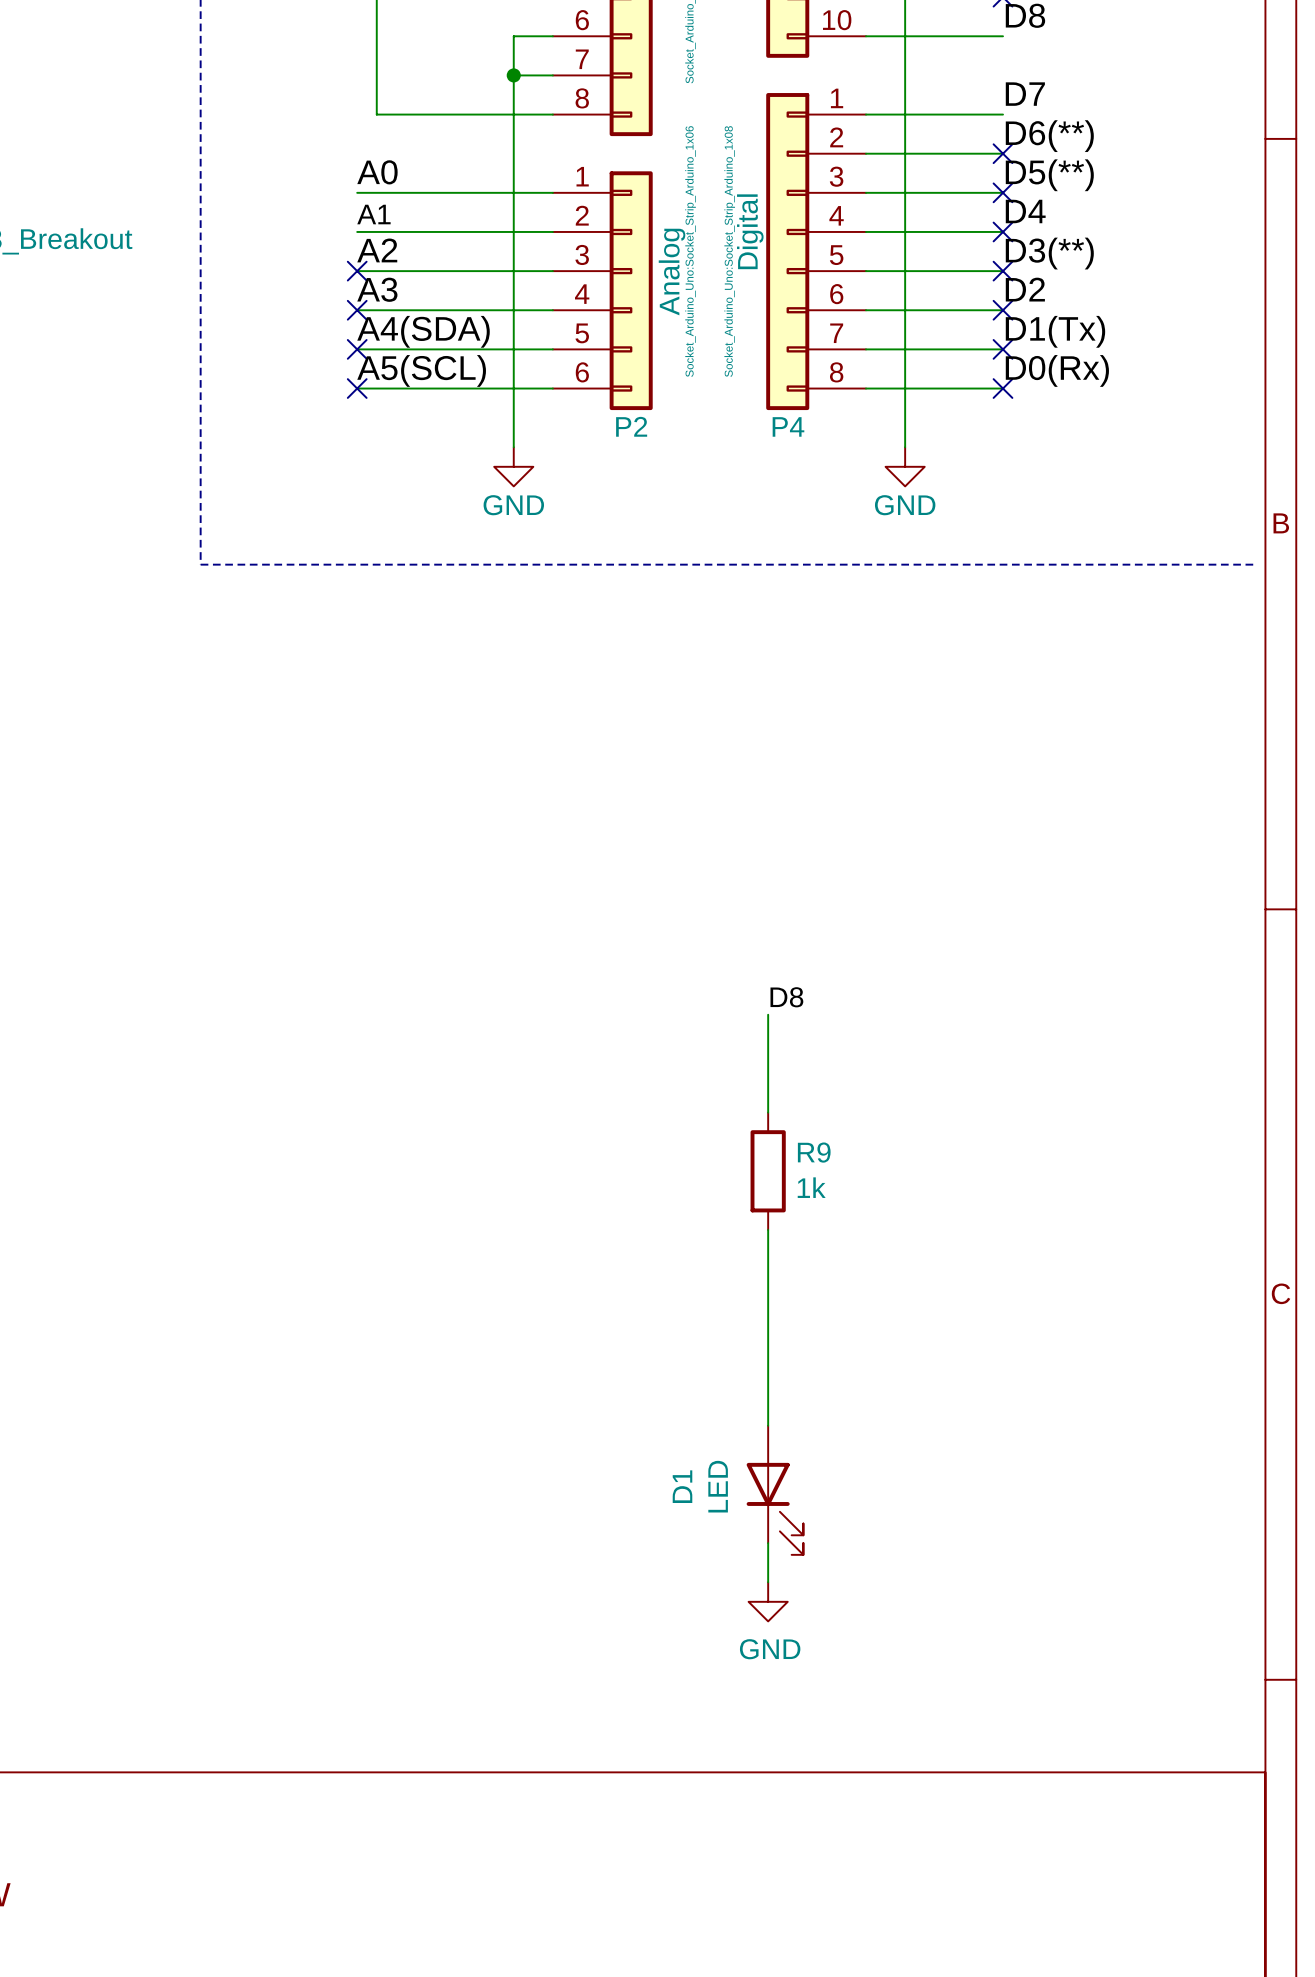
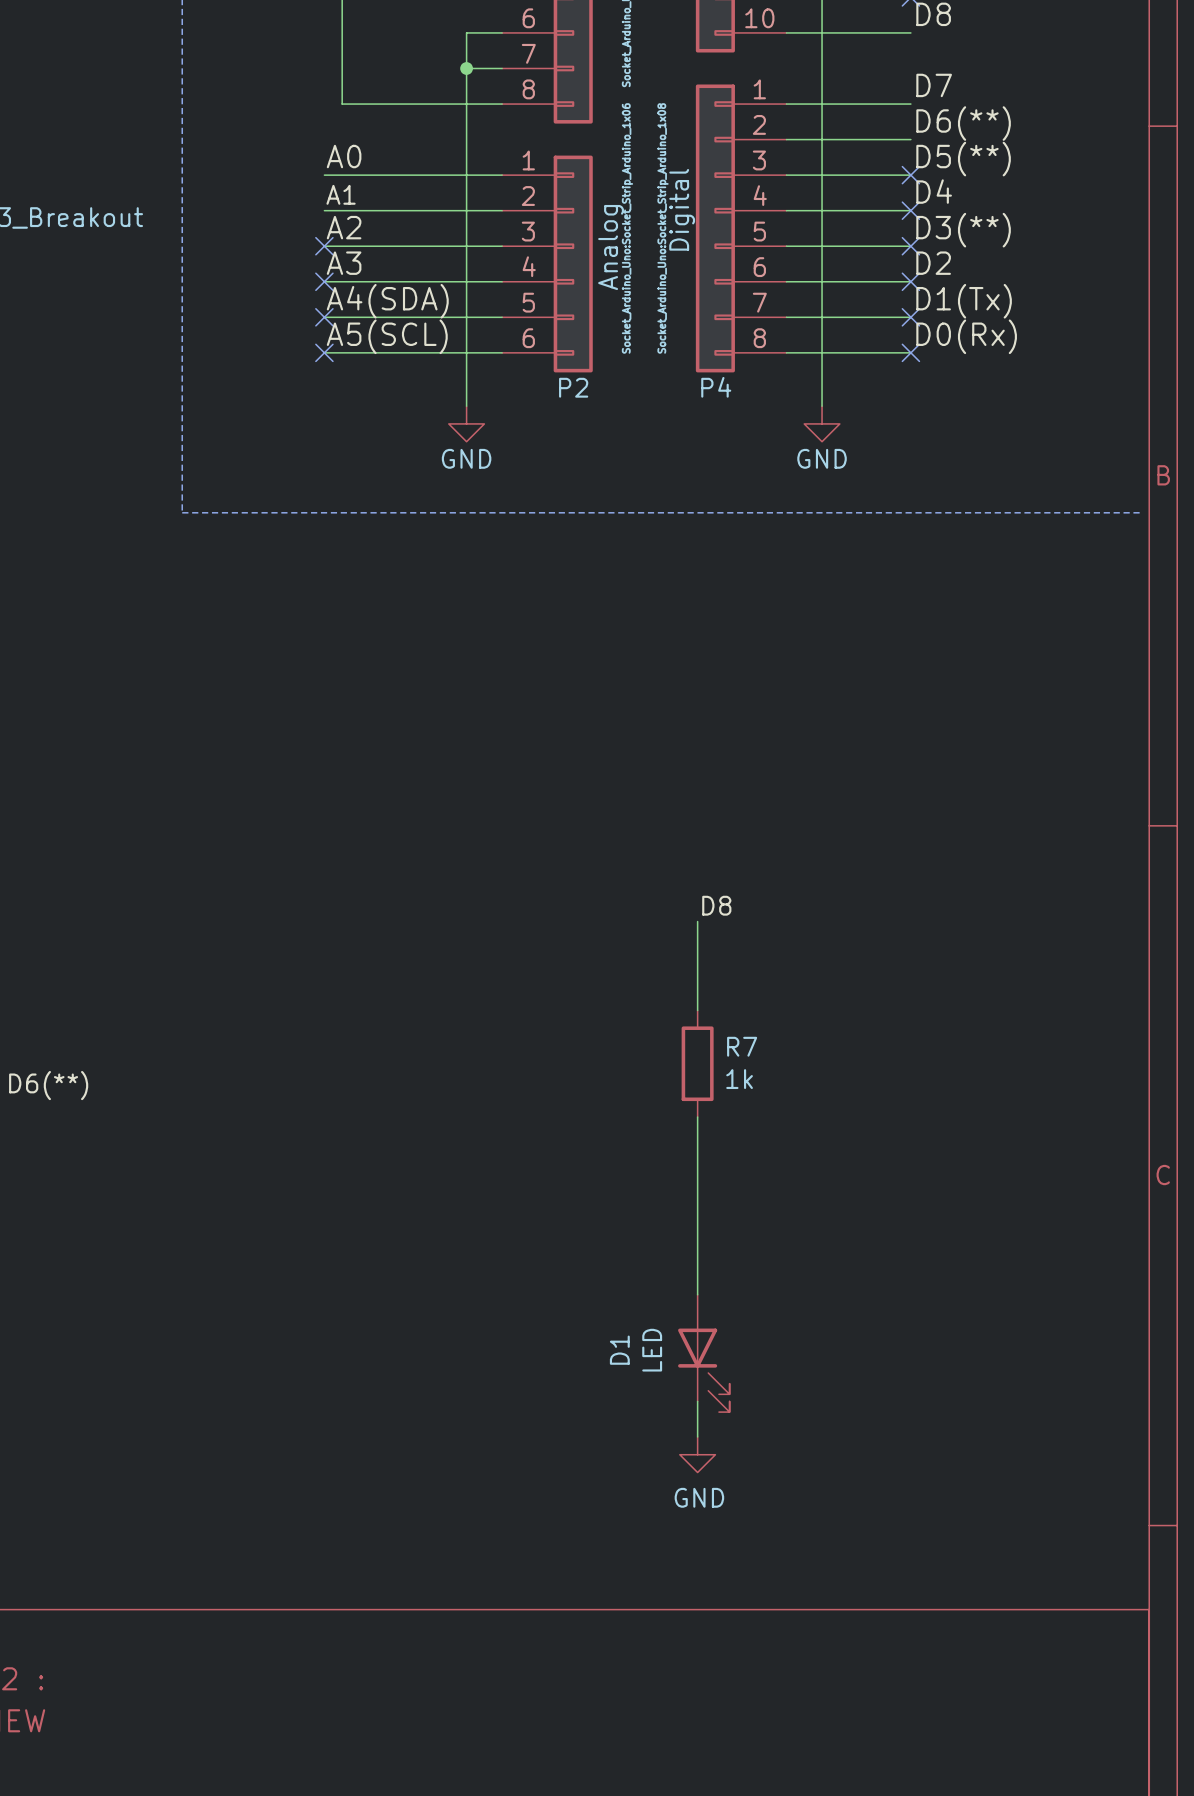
no-connect mark: (1002, 153) -> none
R9 name: R9 (814, 1152) -> R7 (742, 1046)
label: none -> D6(**) (48, 1085)

